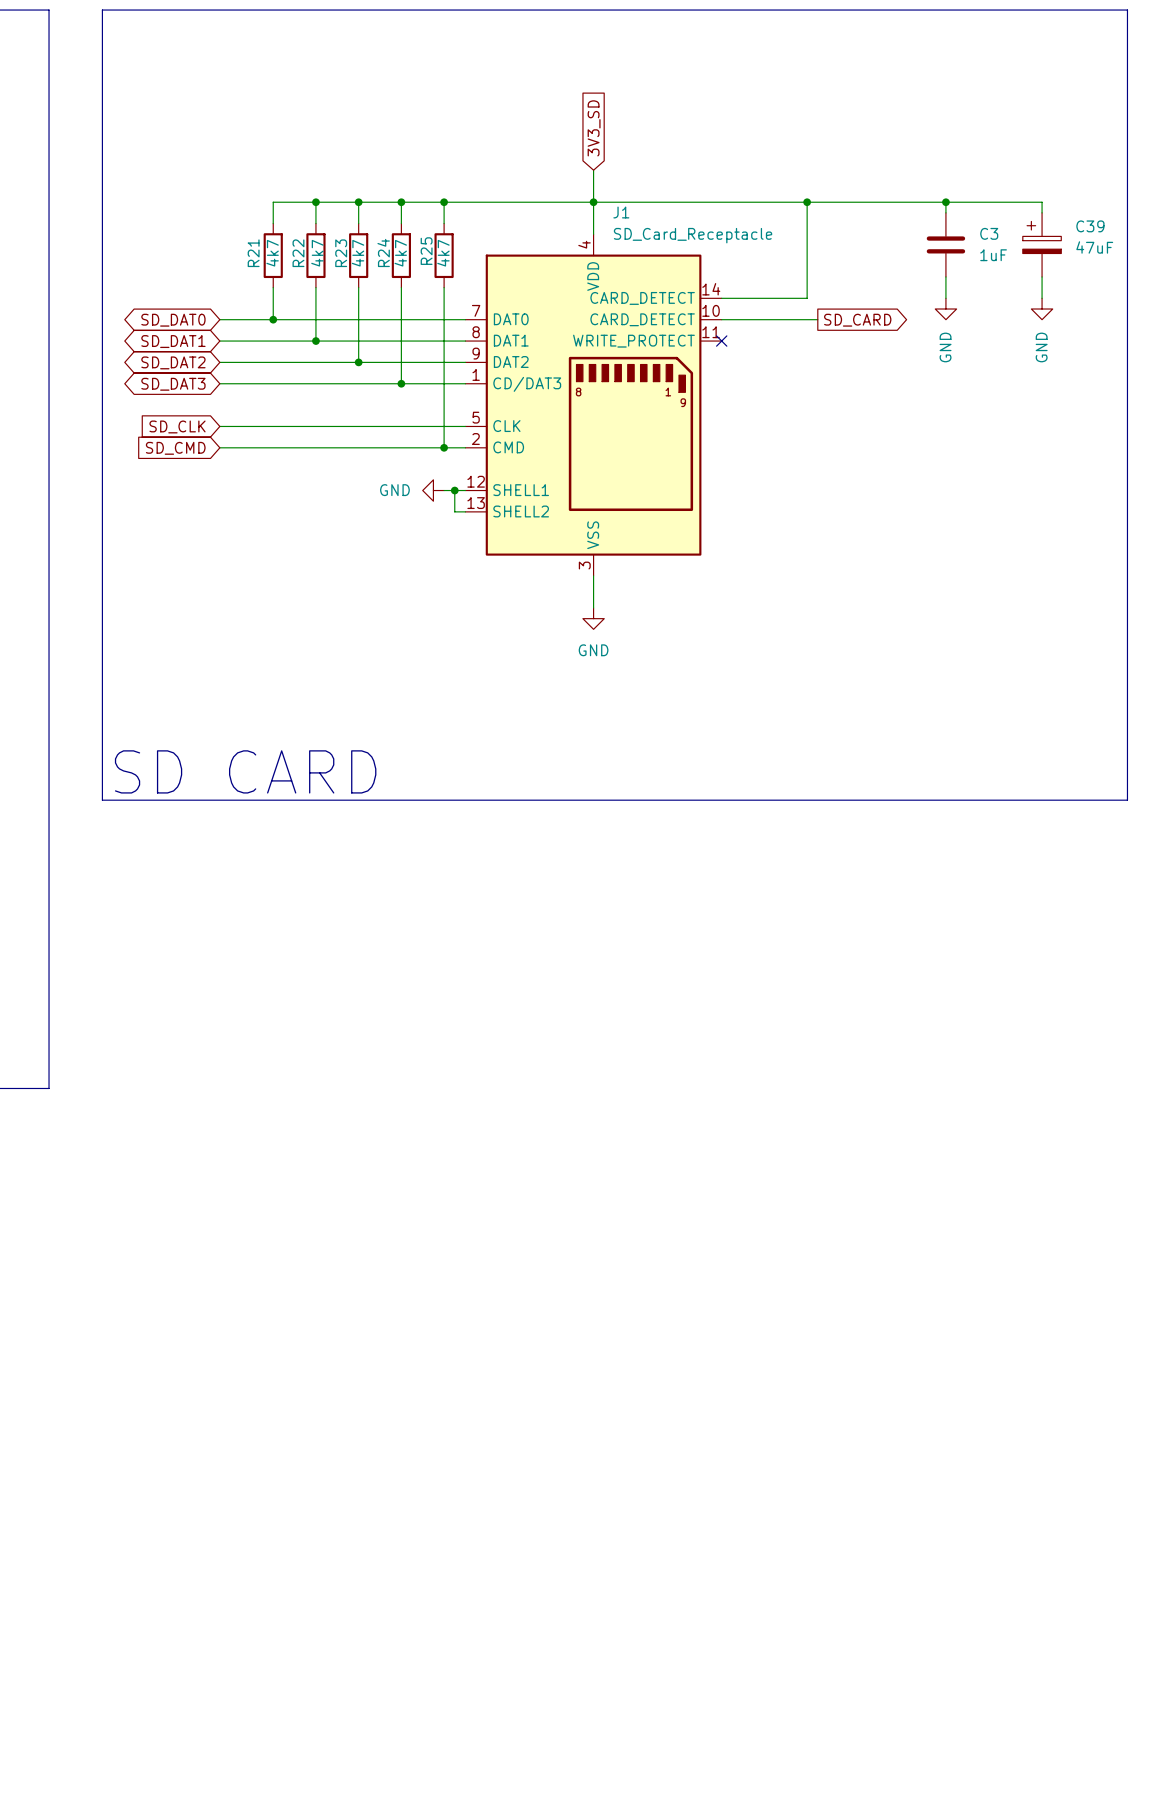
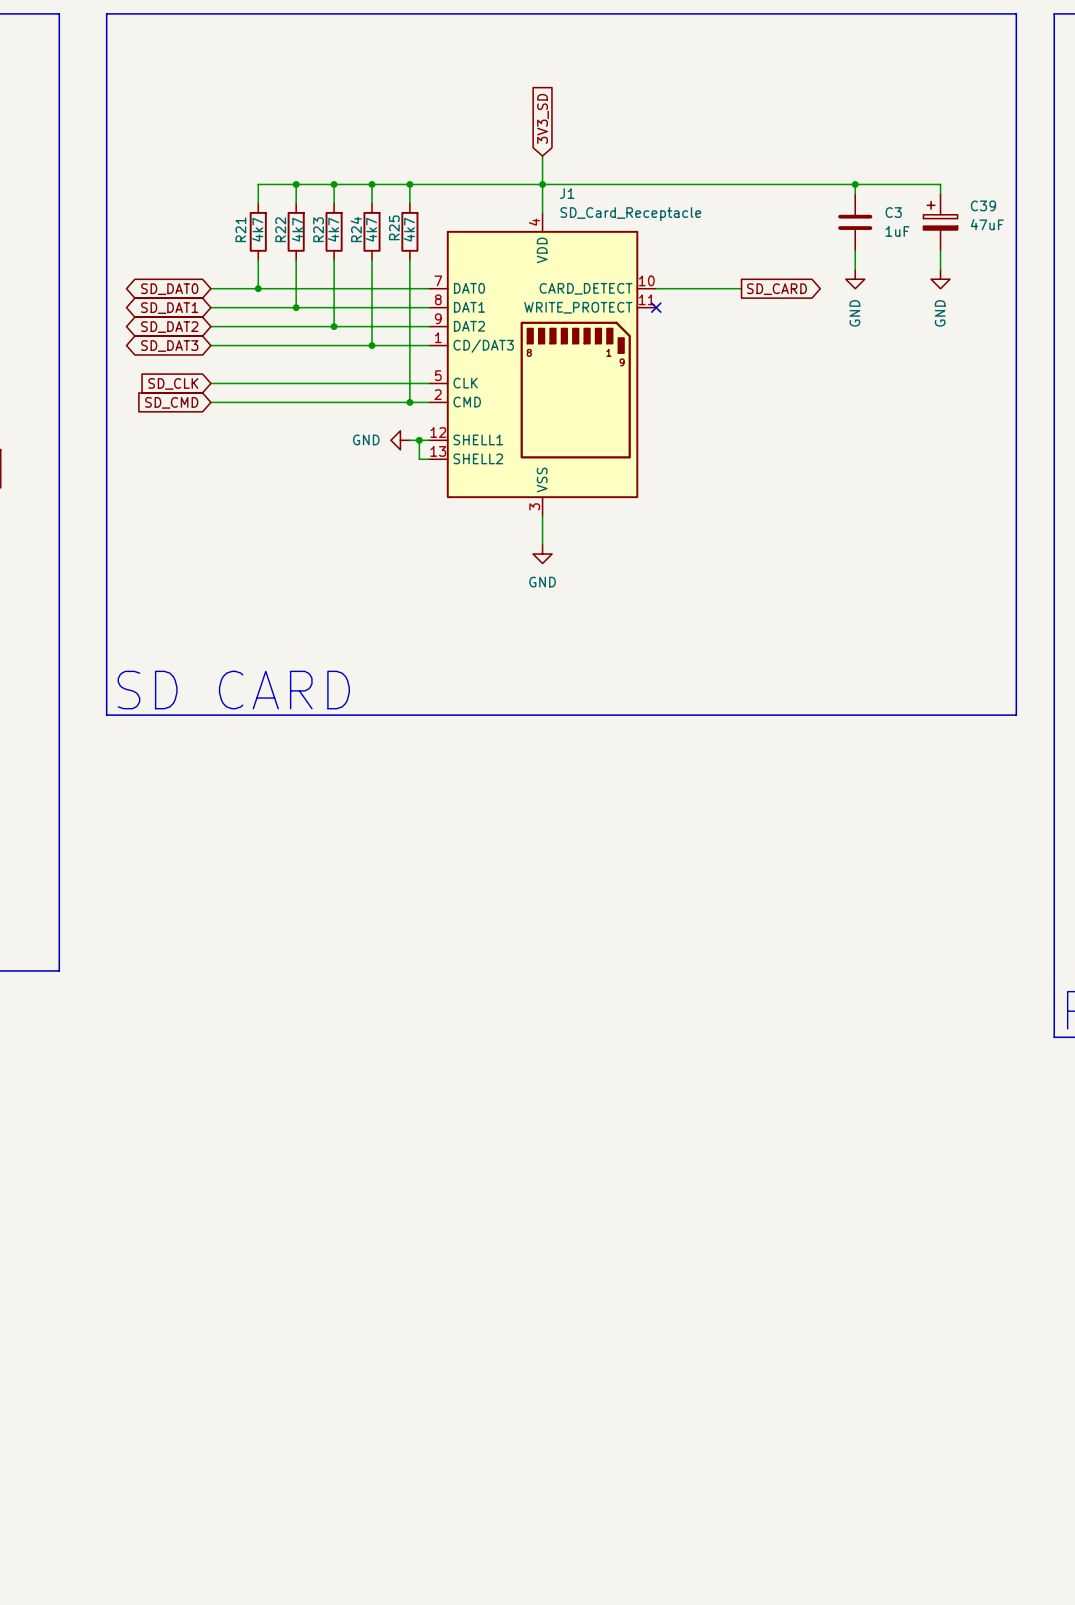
wire: (807, 202) (807, 298) (721, 298) -> none
junction: (807, 202) -> none
J1 symbol: [465, 234, 722, 576] -> [428, 212, 657, 517]

